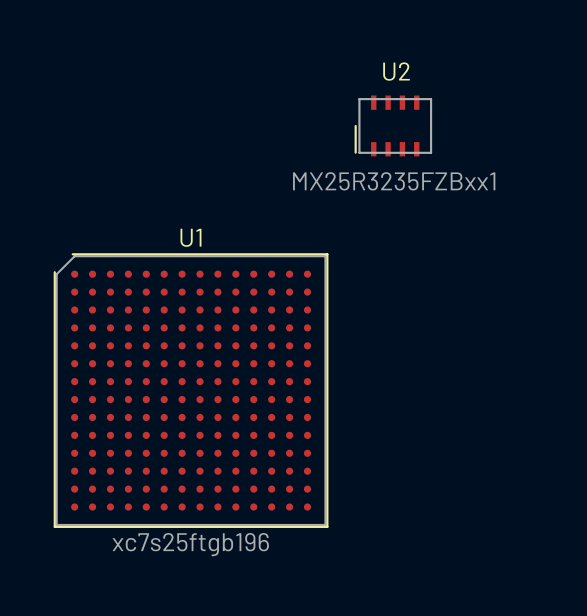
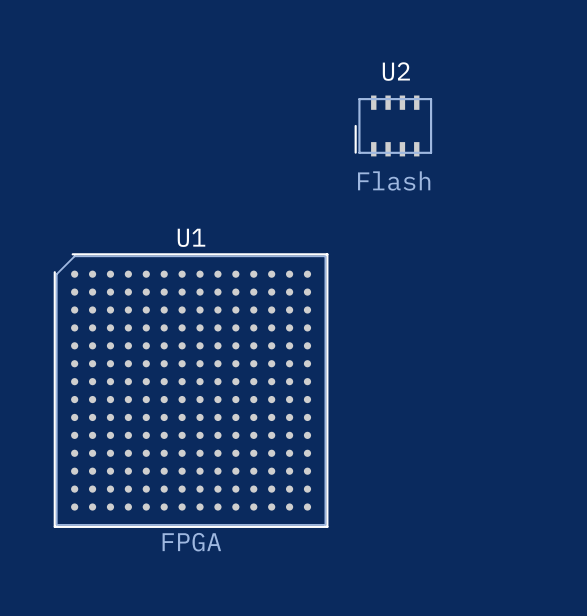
U2 value: MX25R3235FZBxx1 (394, 181) -> Flash (394, 180)
U1 value: xc7s25ftgb196 (190, 544) -> FPGA (191, 542)

